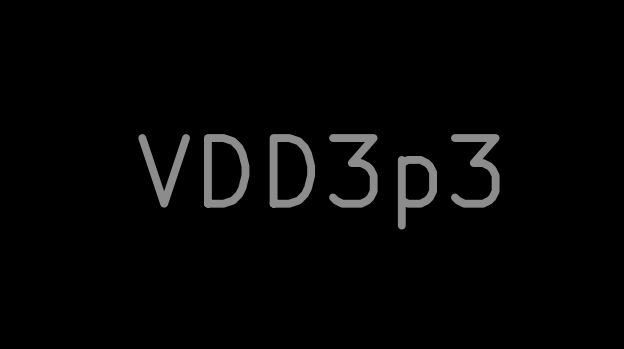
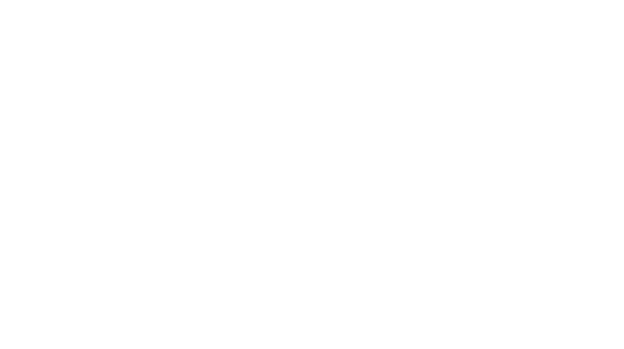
text: VDD3p3 (318, 181) -> none

